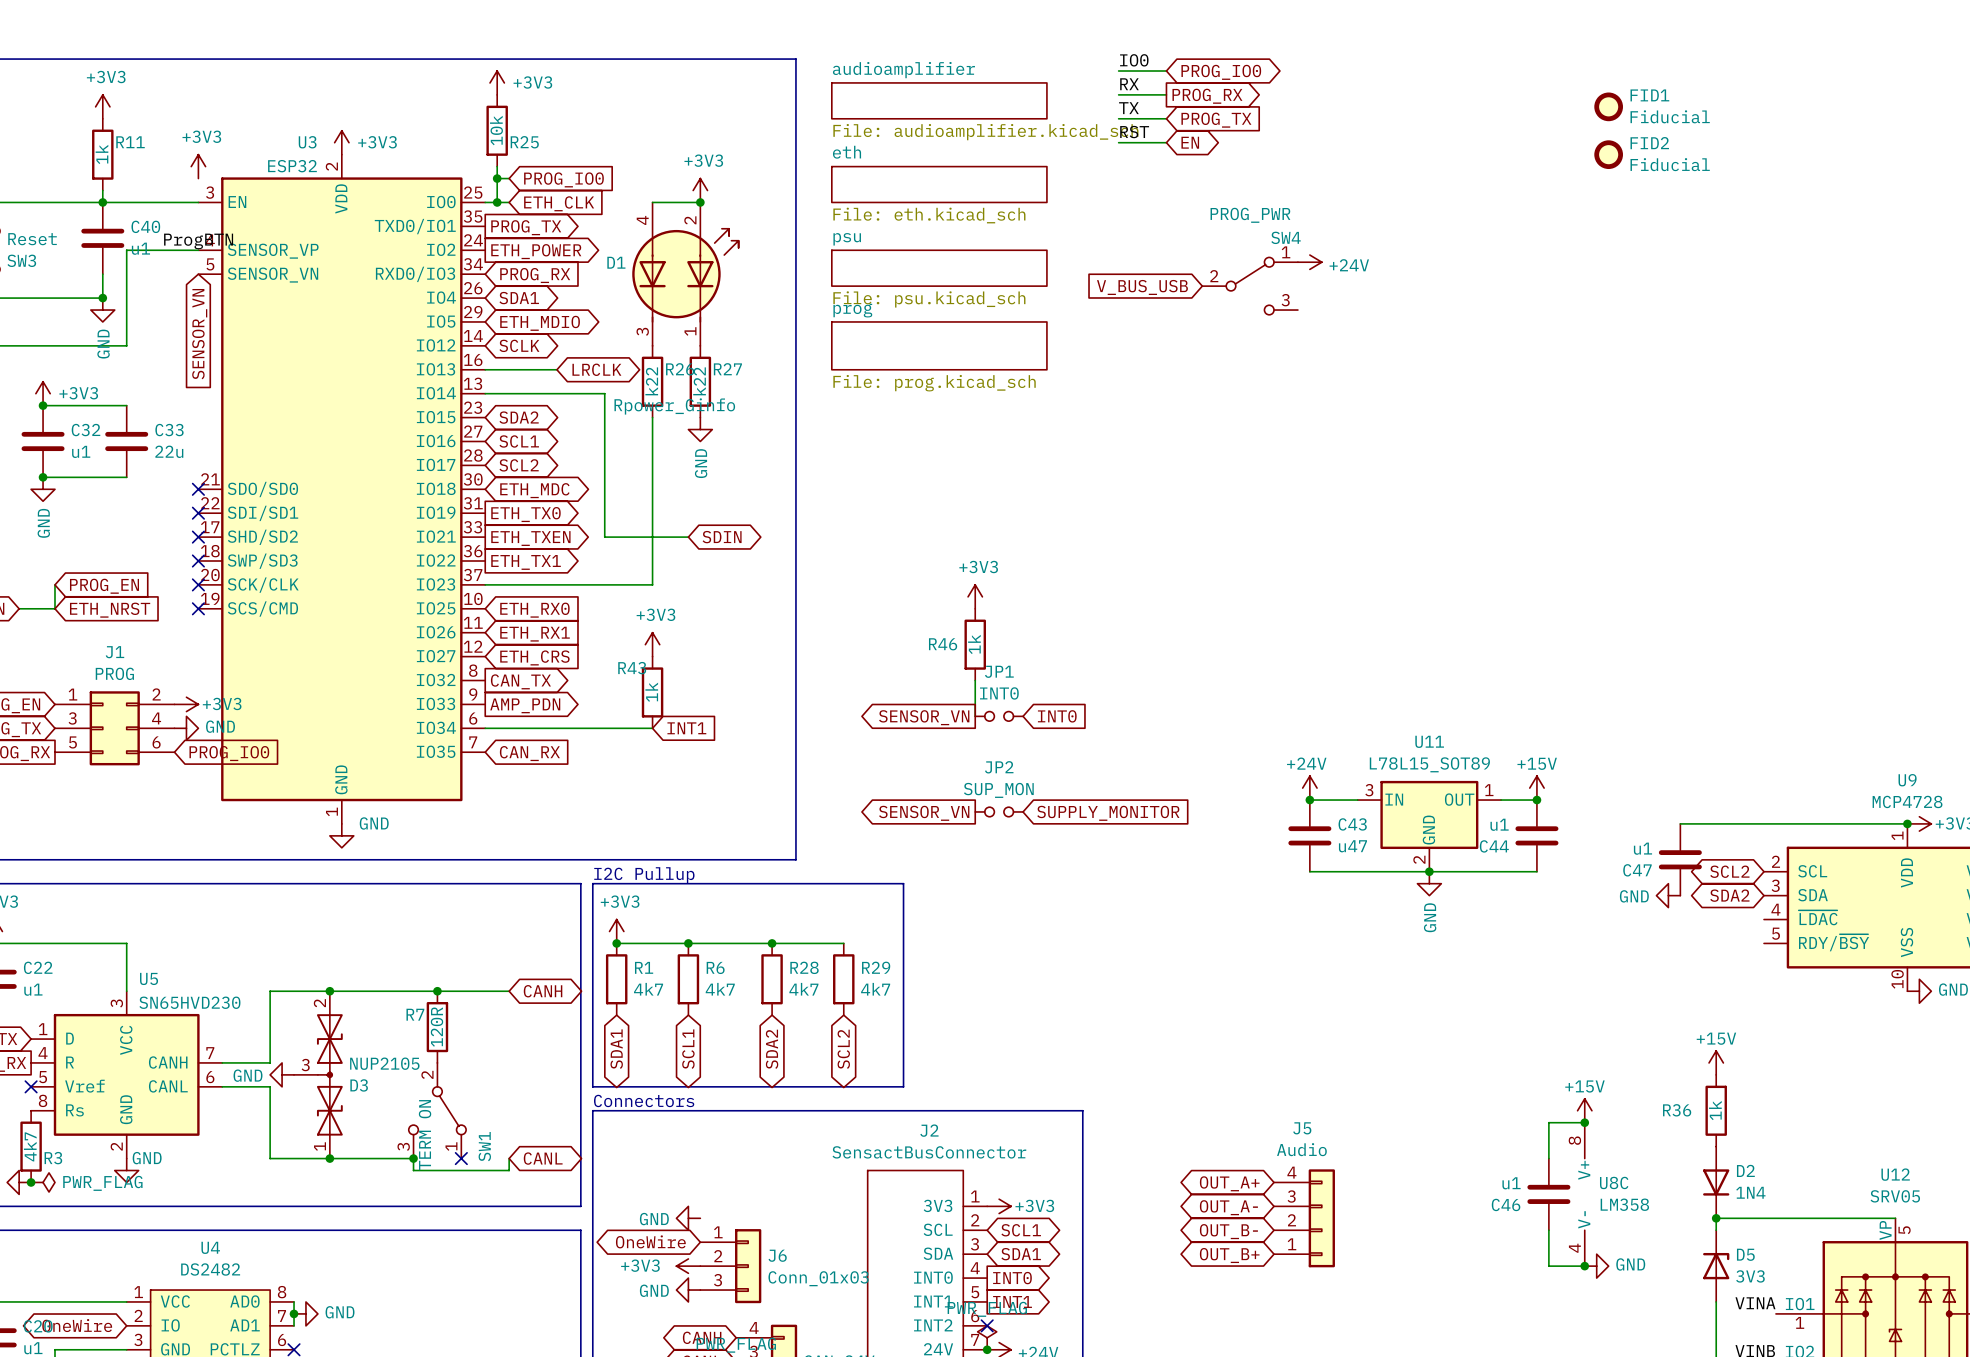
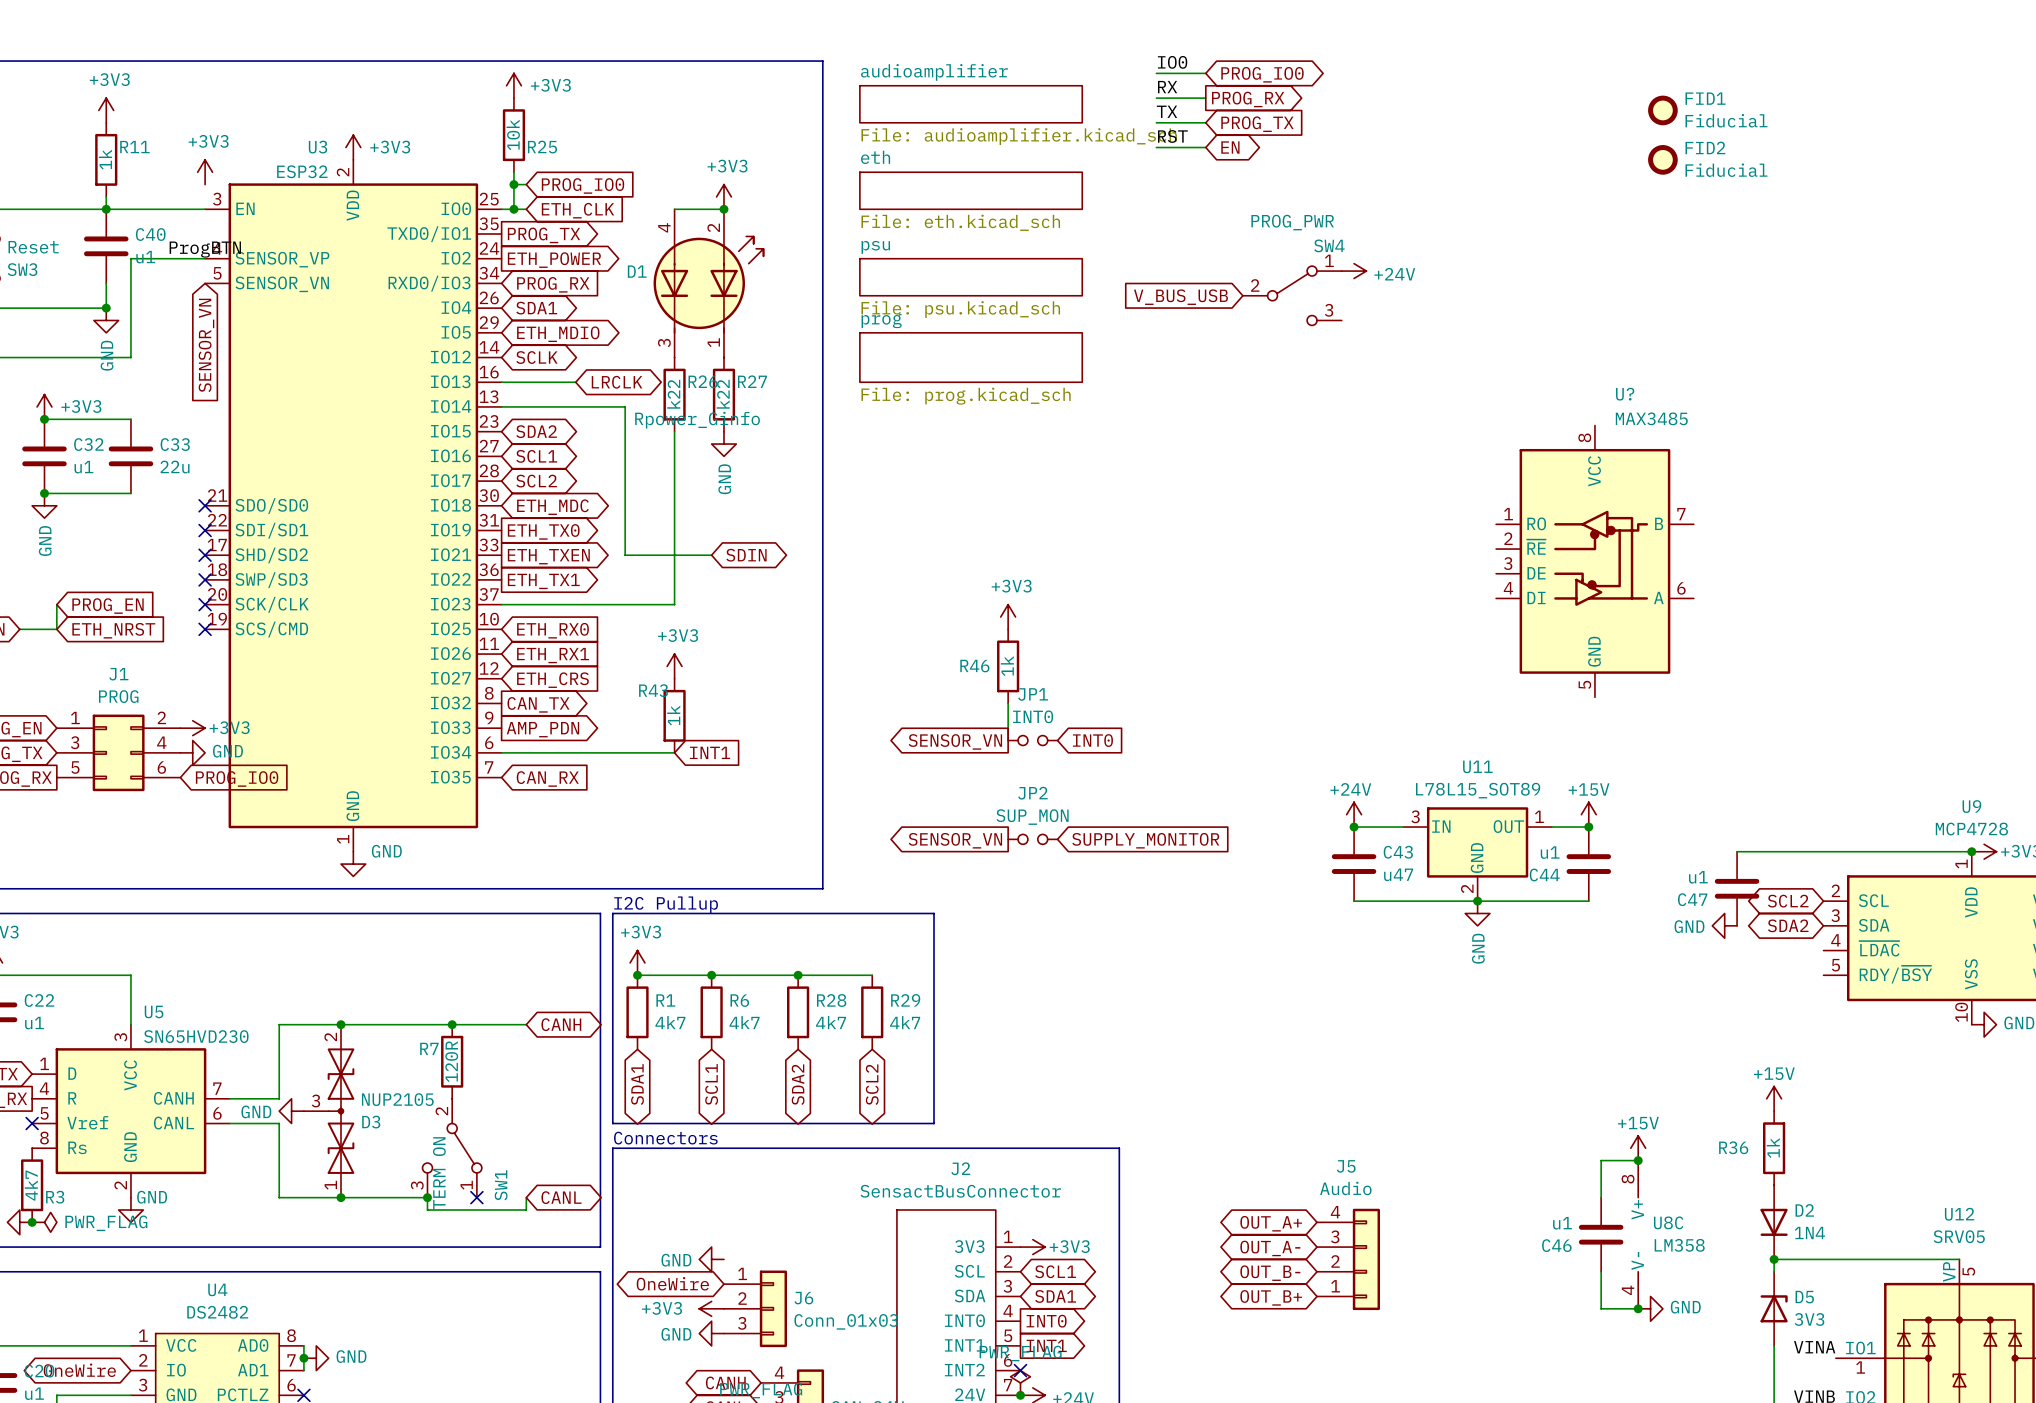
U?: none -> MAX3485 (1594, 561)

